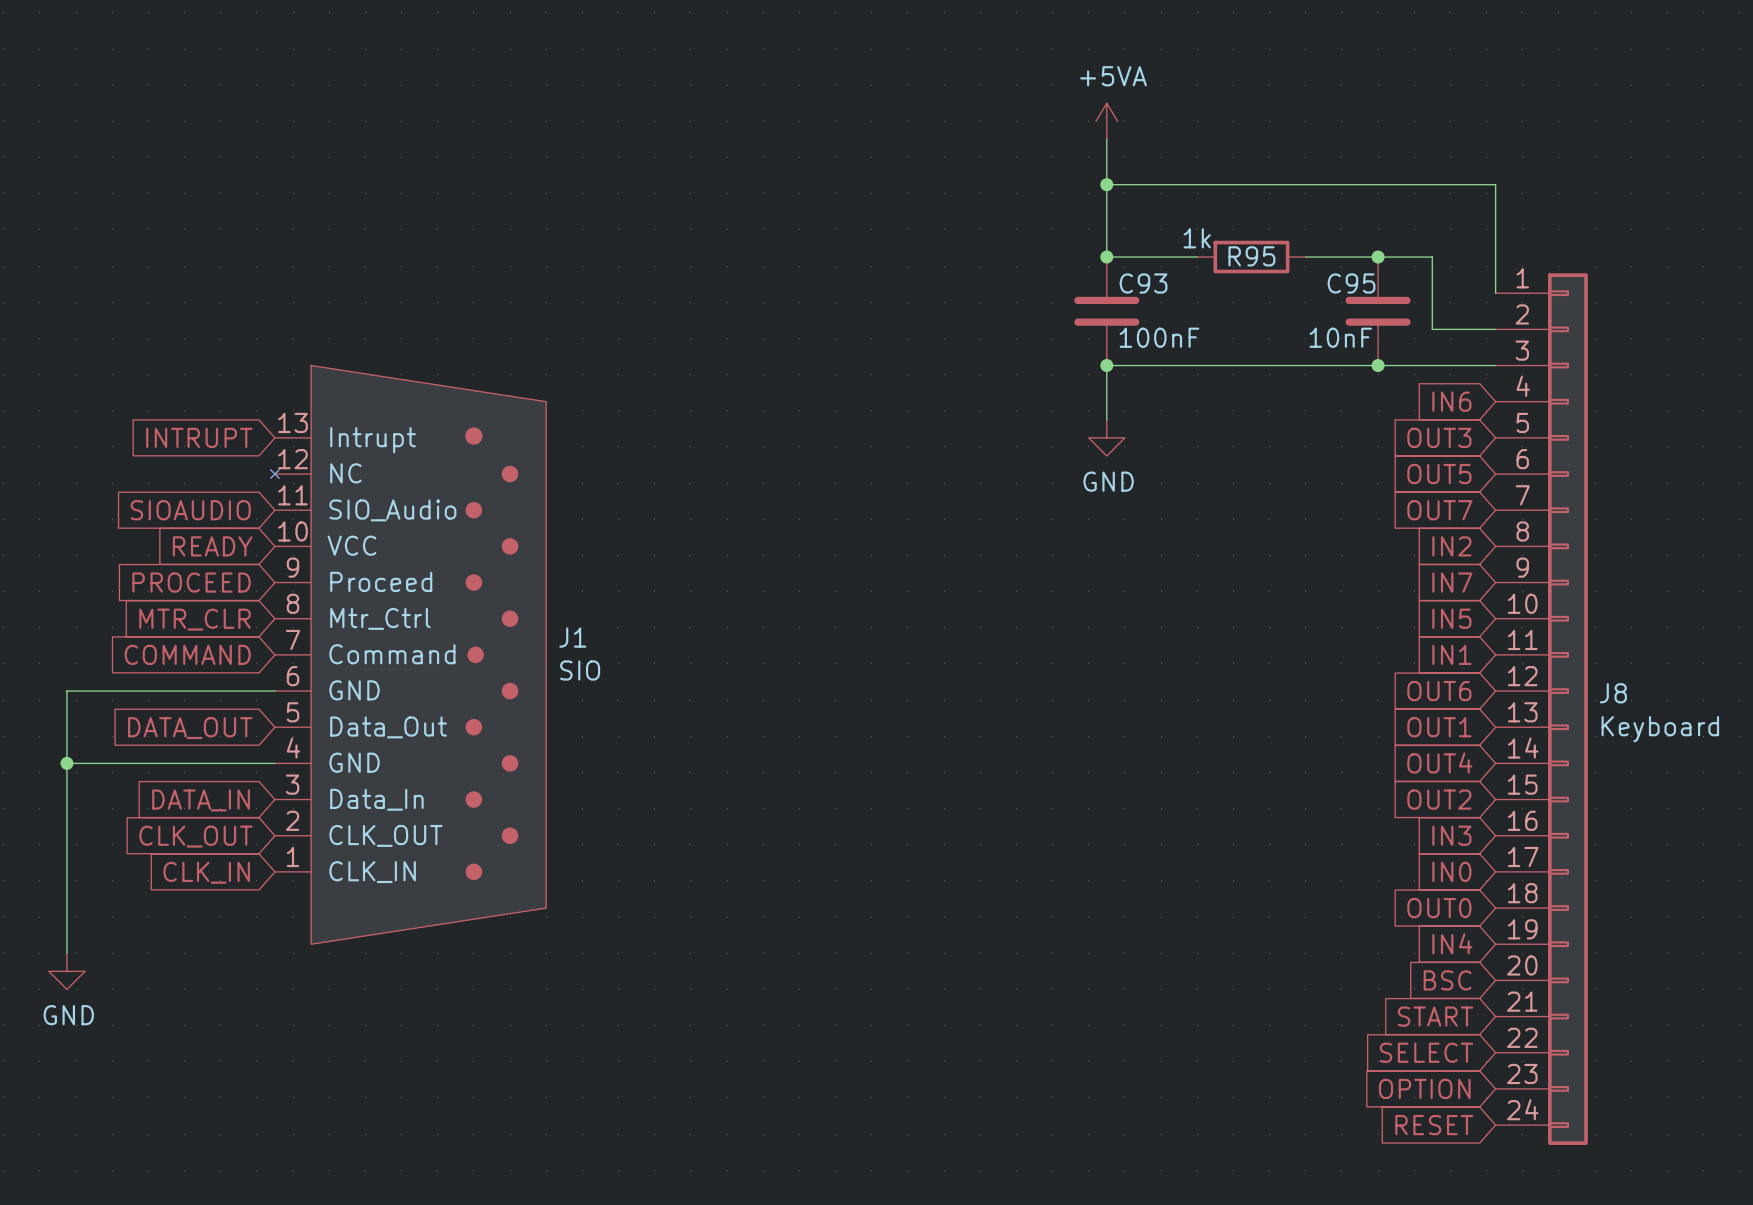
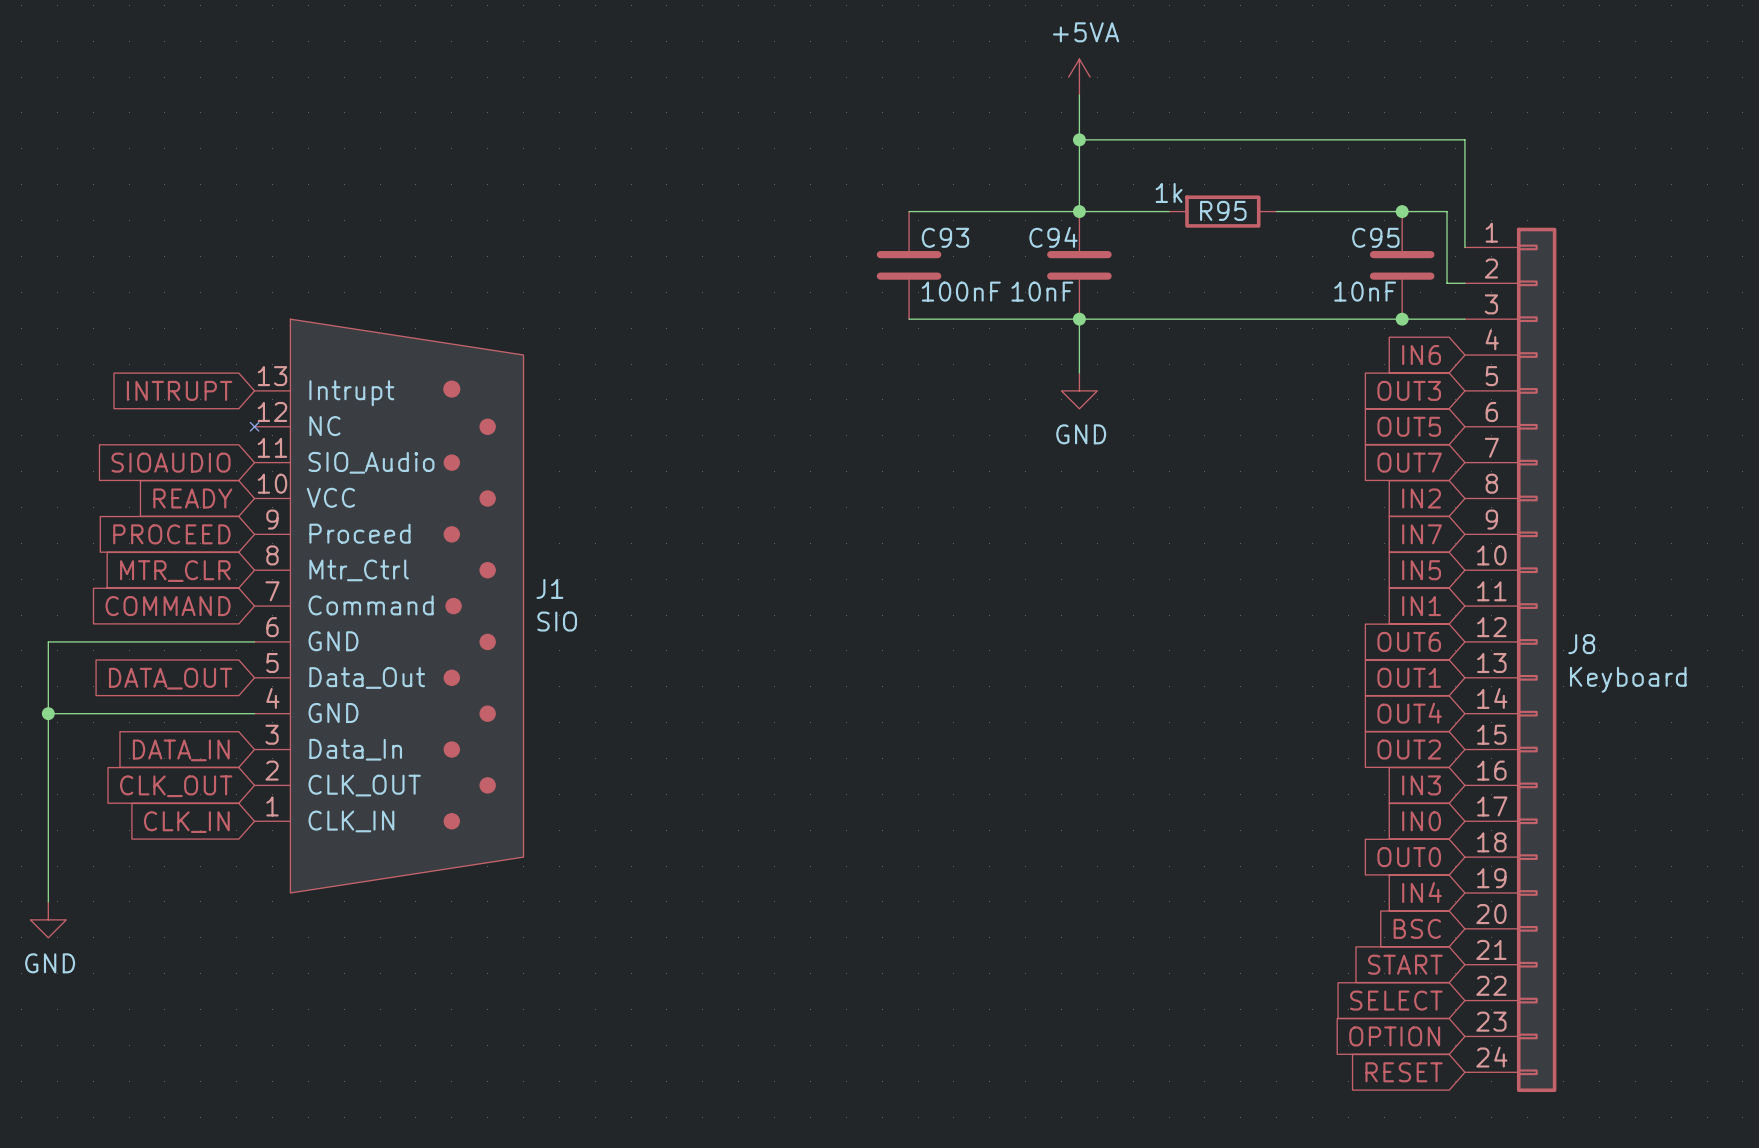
wire: none -> (909, 211) (1079, 211)
junction position: (1378, 257) -> (1402, 211)
wire: (1432, 257) (1432, 329) (1477, 329) -> (1402, 211) (1447, 211) (1447, 283)
C93 name: C93 (1143, 283) -> C94 (1053, 237)
C93: none -> 100nF (909, 265)
C95 position: (1378, 311) -> (1402, 265)
C93 value: 100nF (1159, 337) -> 10nF (1042, 291)
wire: none -> (909, 319) (1079, 319)
junction position: (1378, 365) -> (1402, 319)

